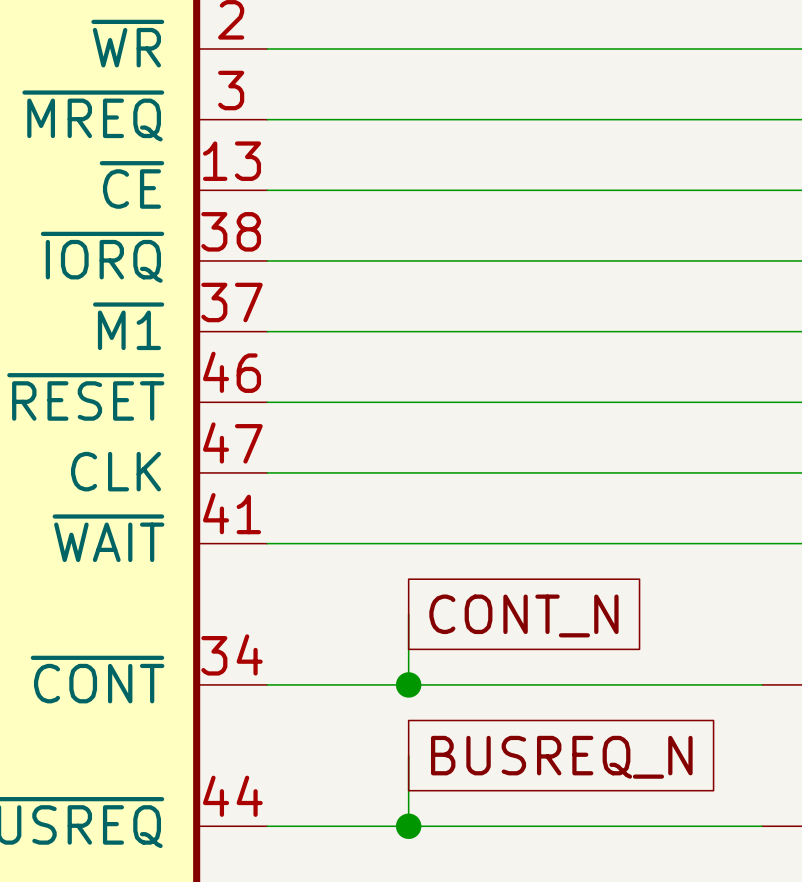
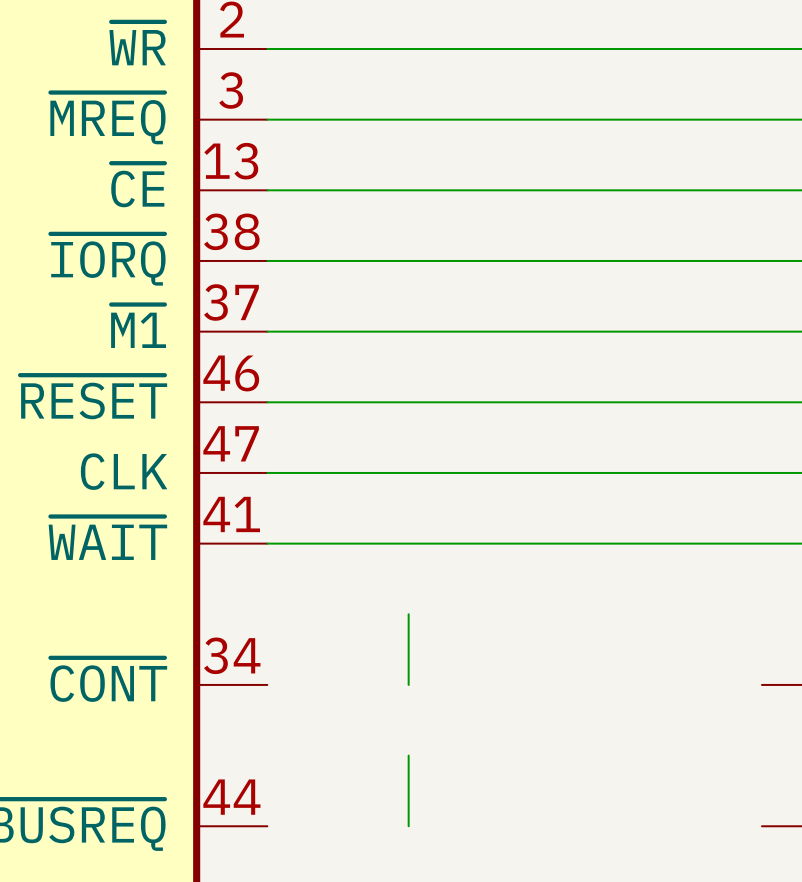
global label: CONT_N (523, 615) -> none
wire: (267, 684) (761, 684) -> none
junction: (408, 684) -> none
global label: BUSREQ_N (561, 757) -> none
wire: (267, 826) (761, 826) -> none
junction: (408, 826) -> none

